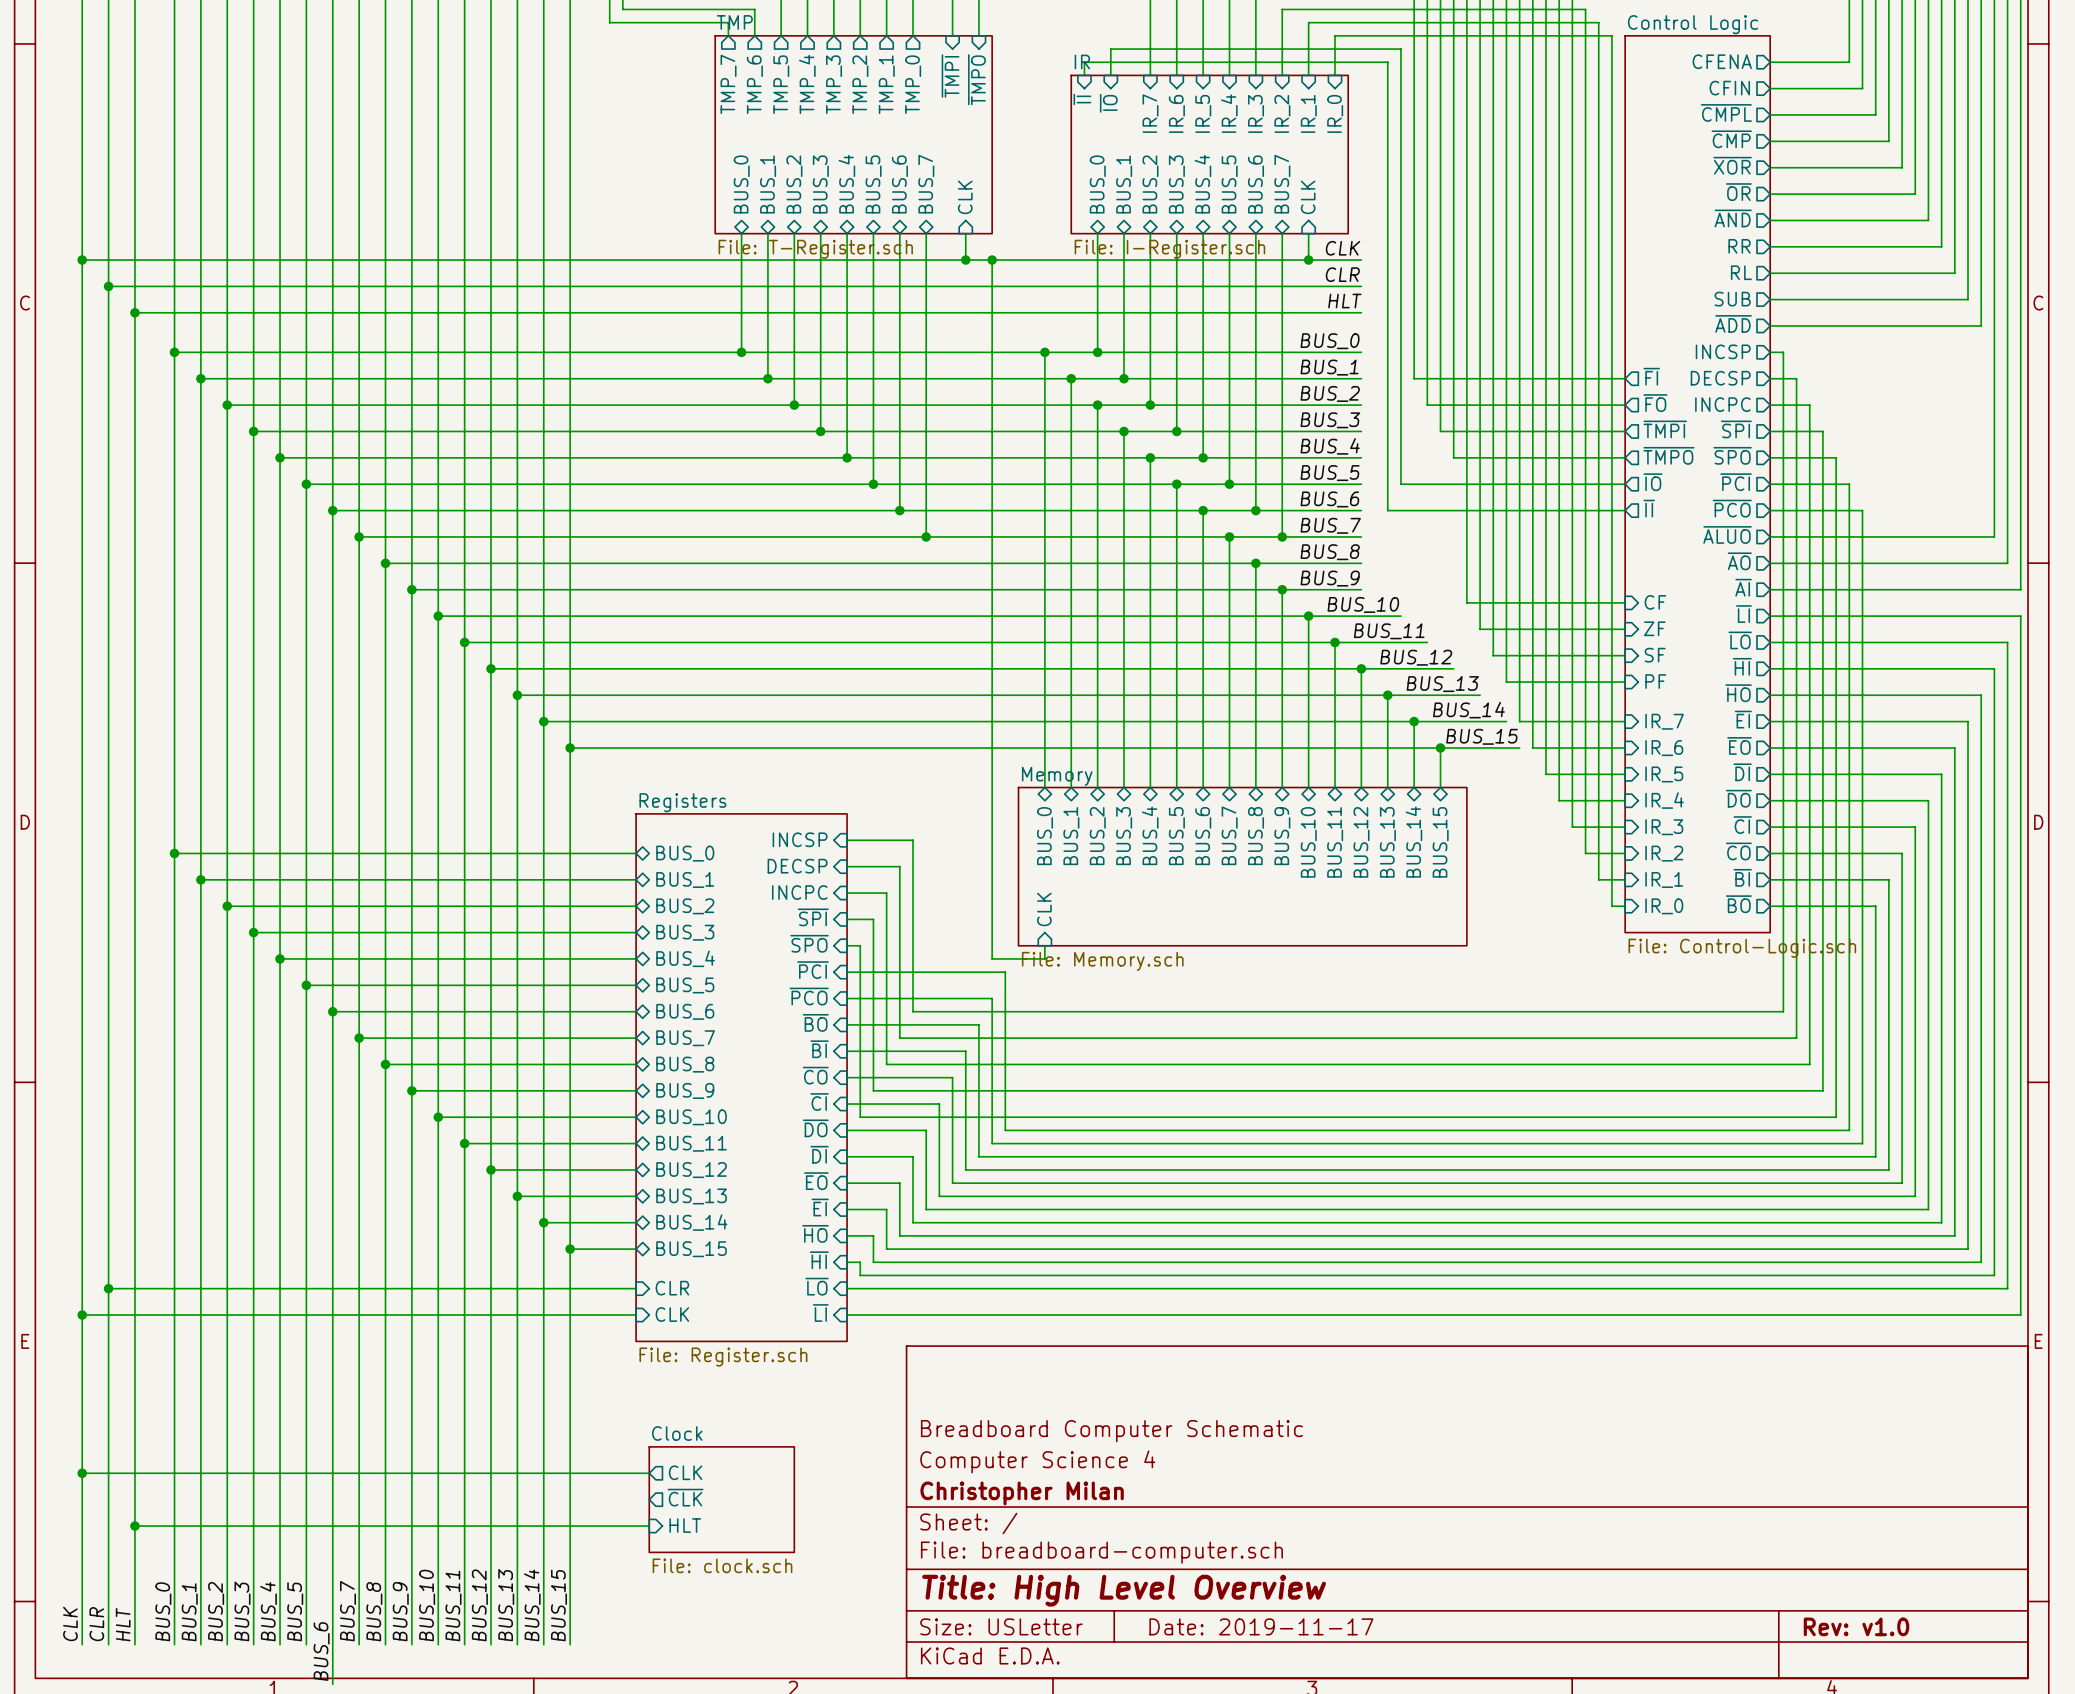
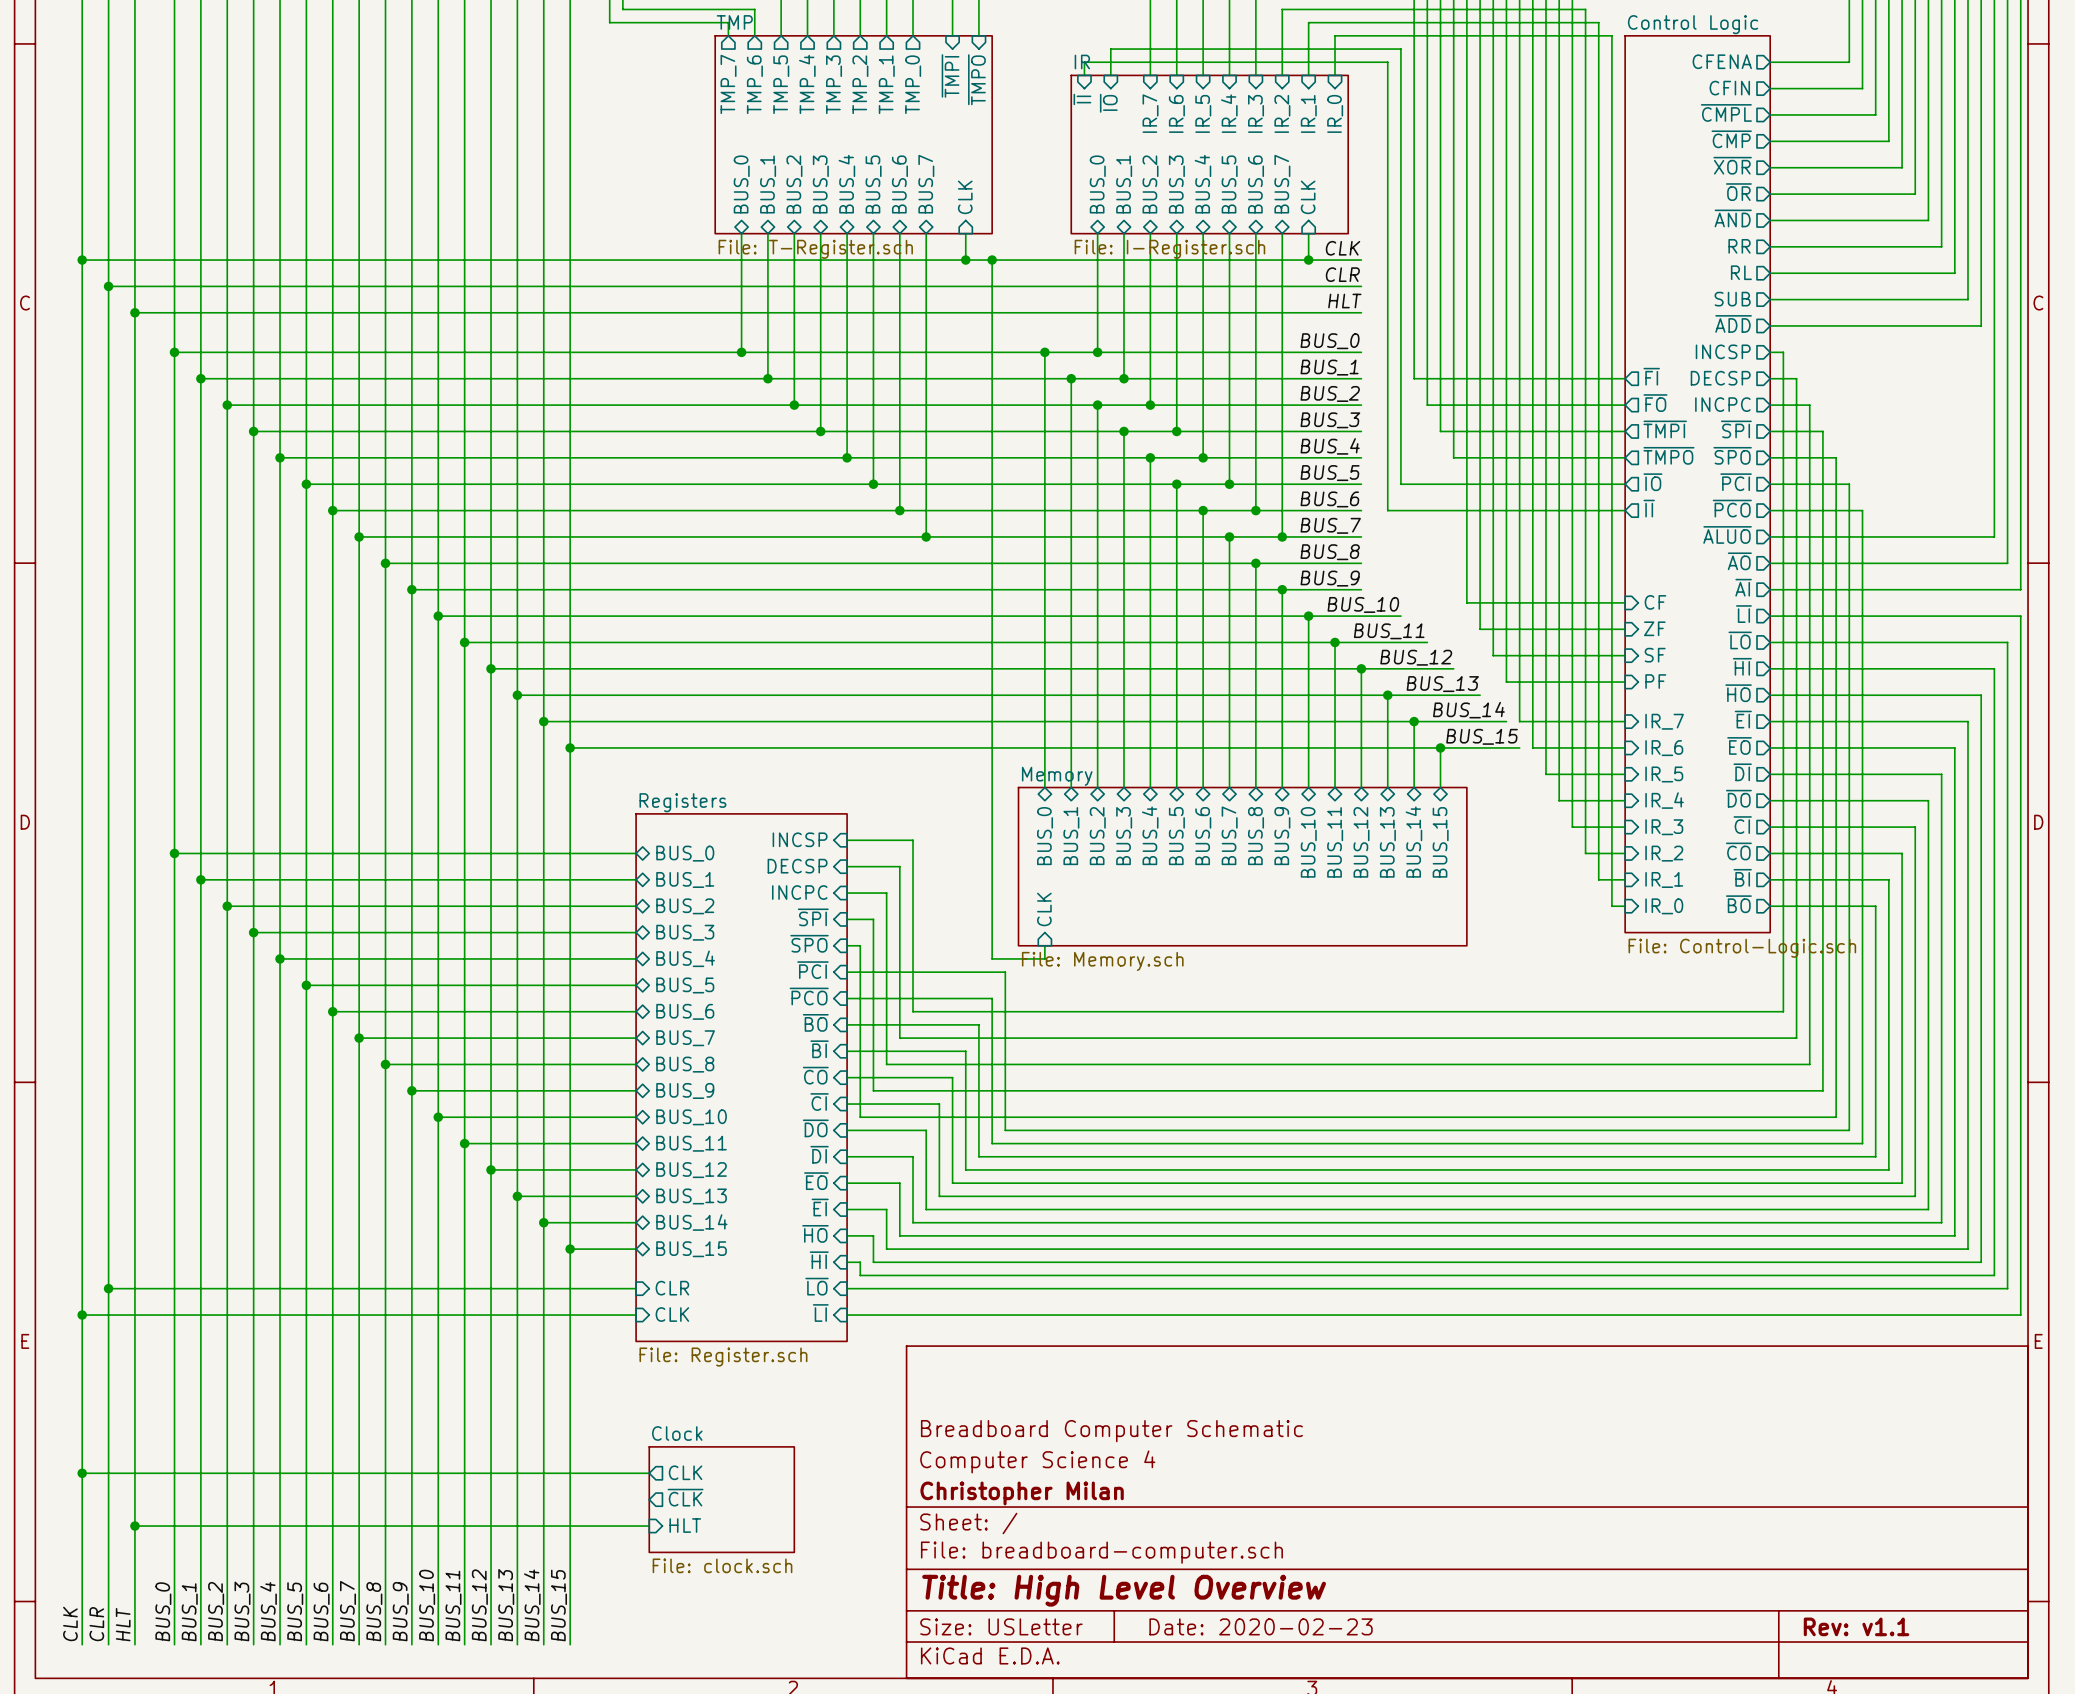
title block: Date: 2019-11-17 (1261, 1626) -> Date: 2020-02-23 (1261, 1626)
title block: Rev: v1.0 (1856, 1626) -> Rev: v1.1 (1856, 1626)
wire: (332, 1644) (332, 1684) -> none
label position: BUS_6 (321, 1651) -> BUS_6 (321, 1611)

